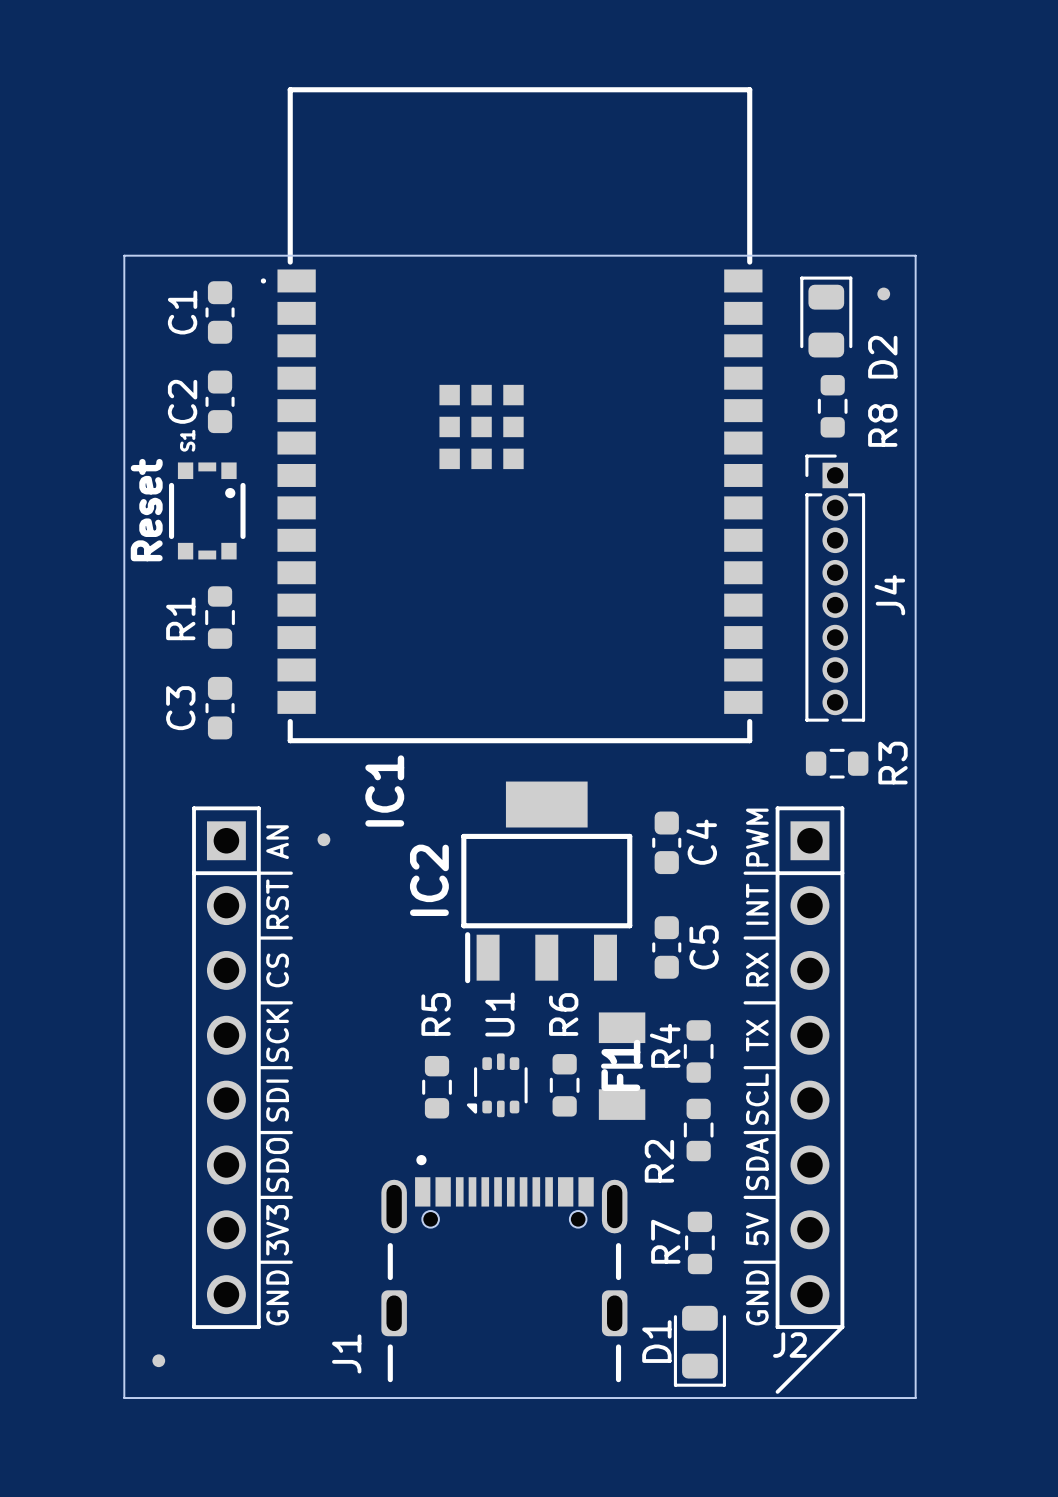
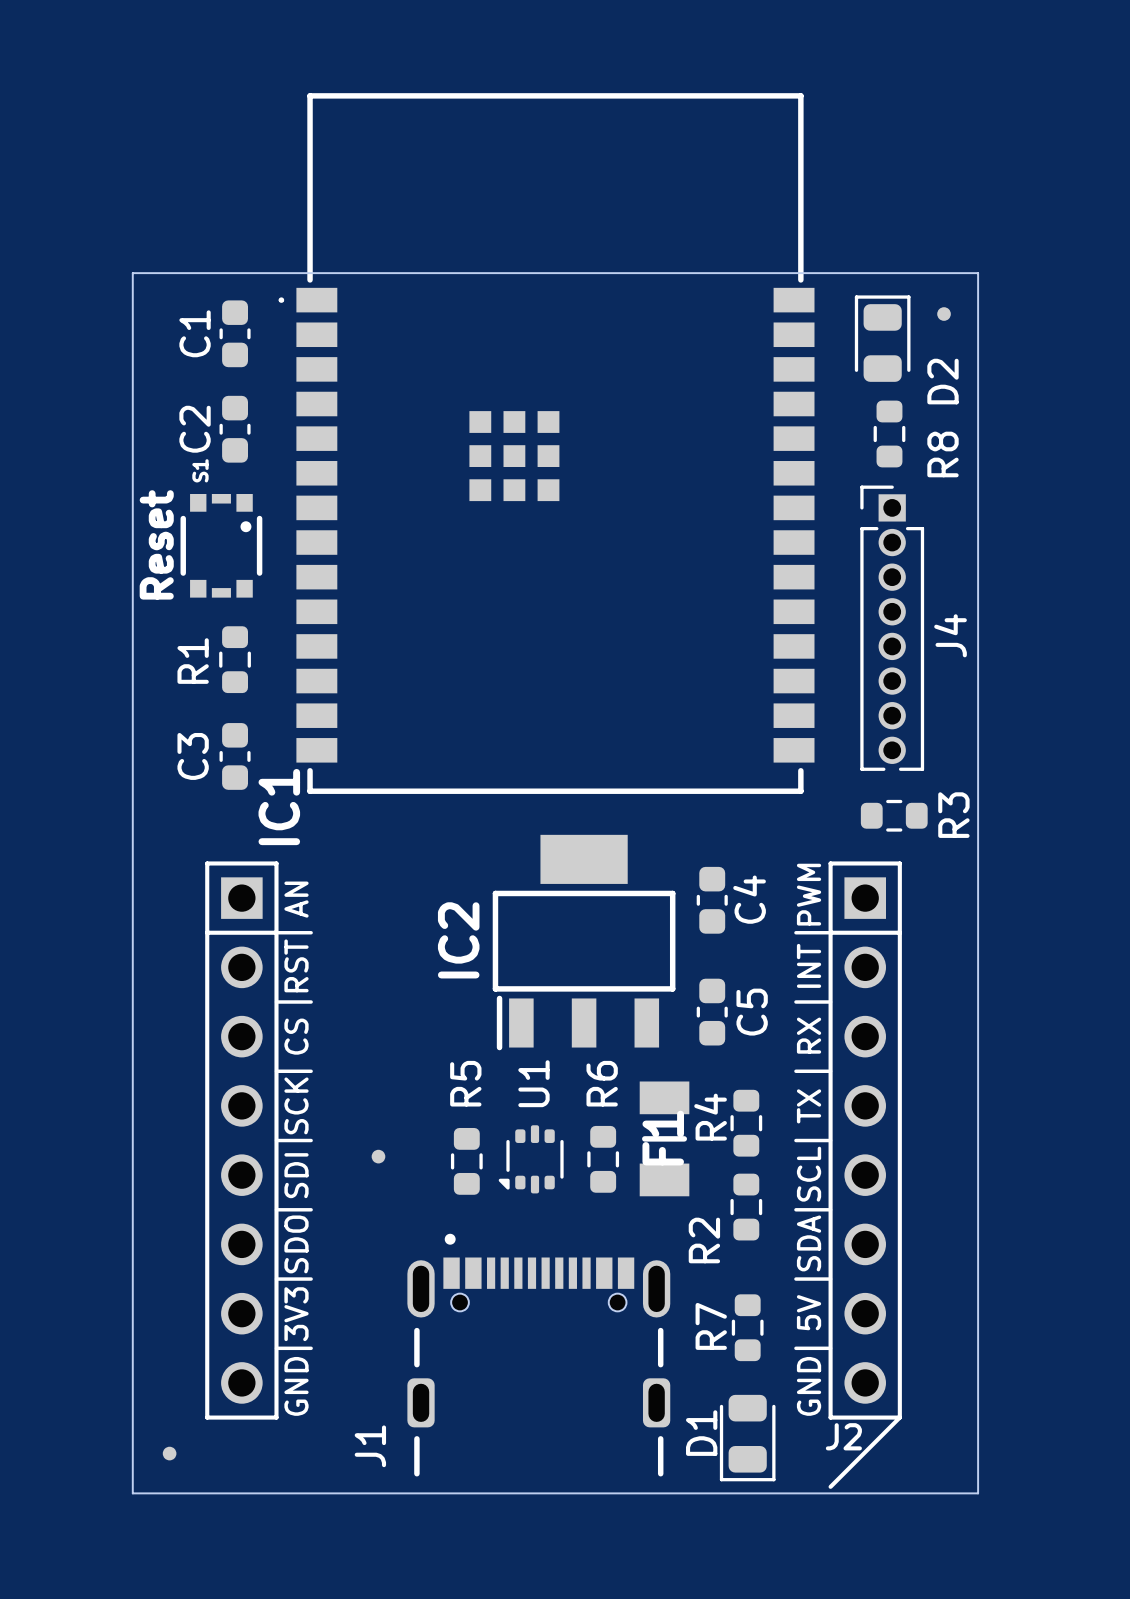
IC1 name position: IC1 (384, 790) -> IC1 (279, 807)
part position: (323, 839) -> (378, 1156)

